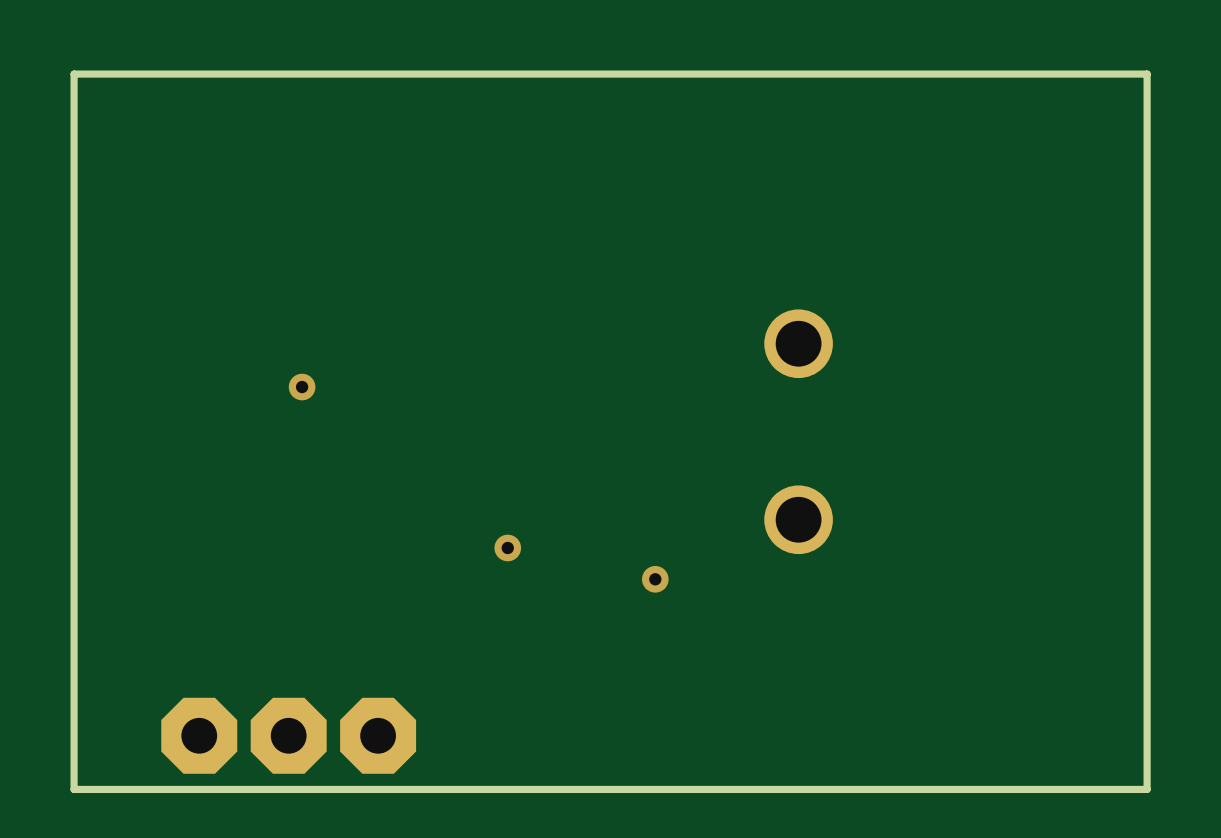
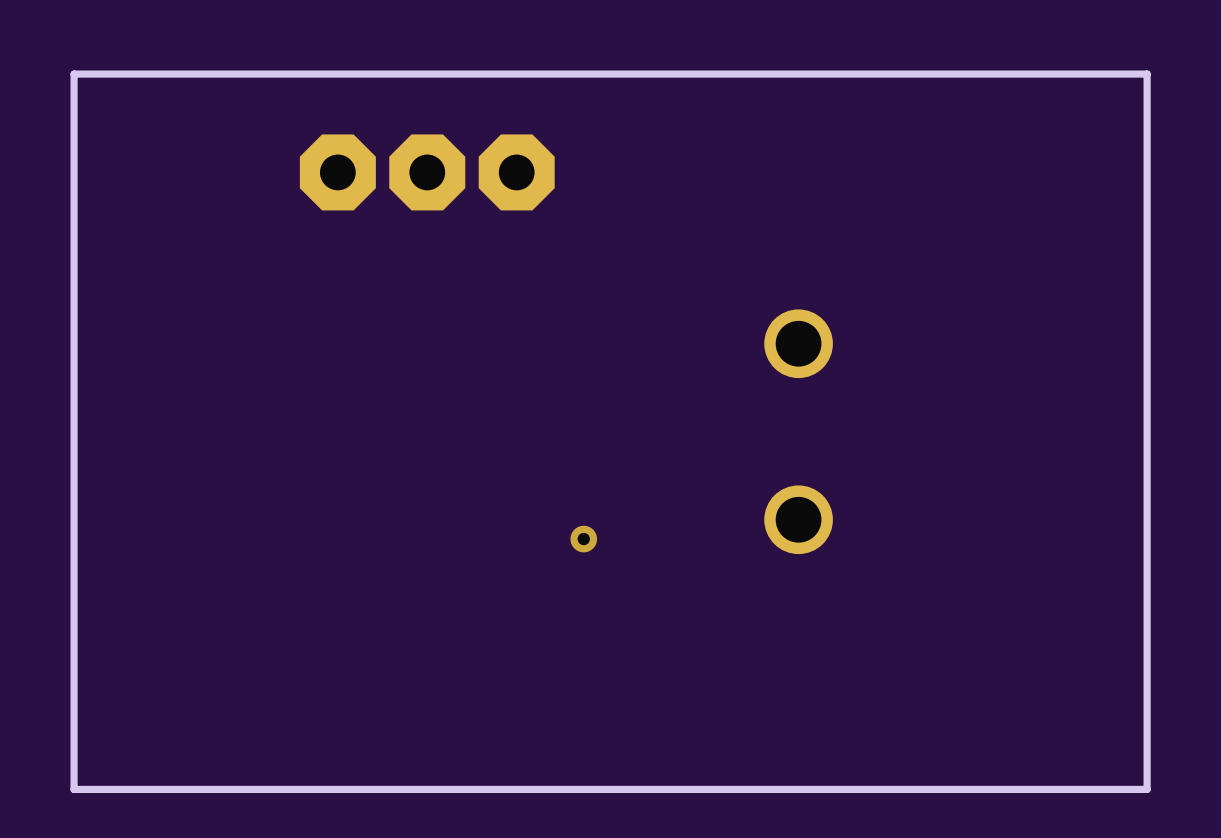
part: none -> (337, 172)
part: none -> (427, 172)
part: none -> (516, 172)
via: (302, 387) -> none
via: none -> (583, 539)
via: (507, 547) -> none
via: (655, 579) -> none
part: (199, 735) -> none
part: (288, 735) -> none
part: (378, 735) -> none

